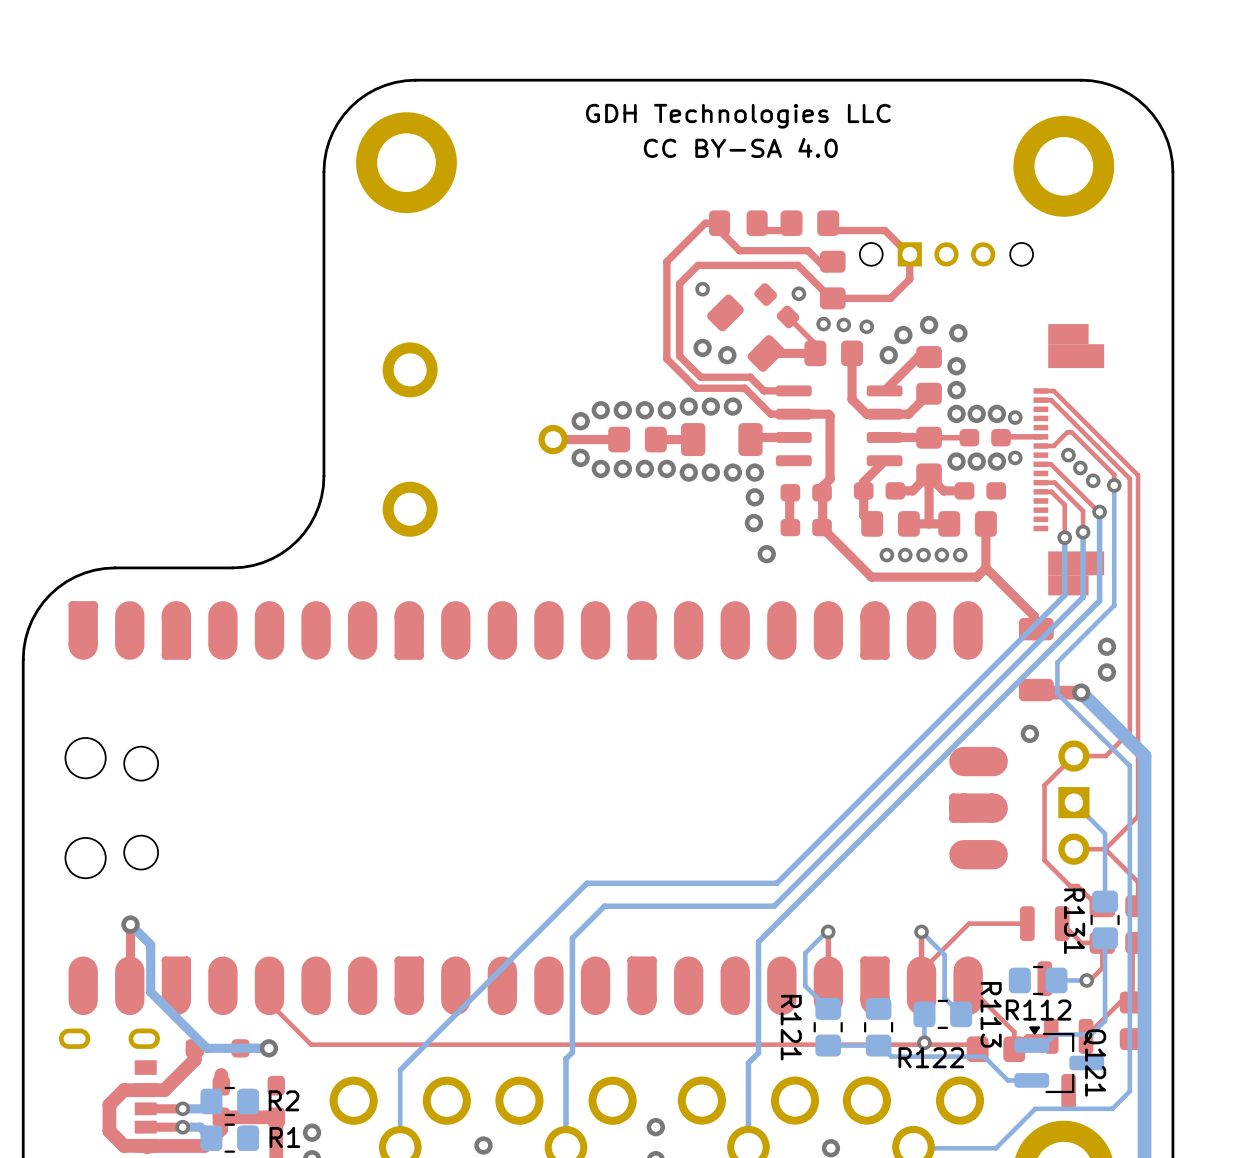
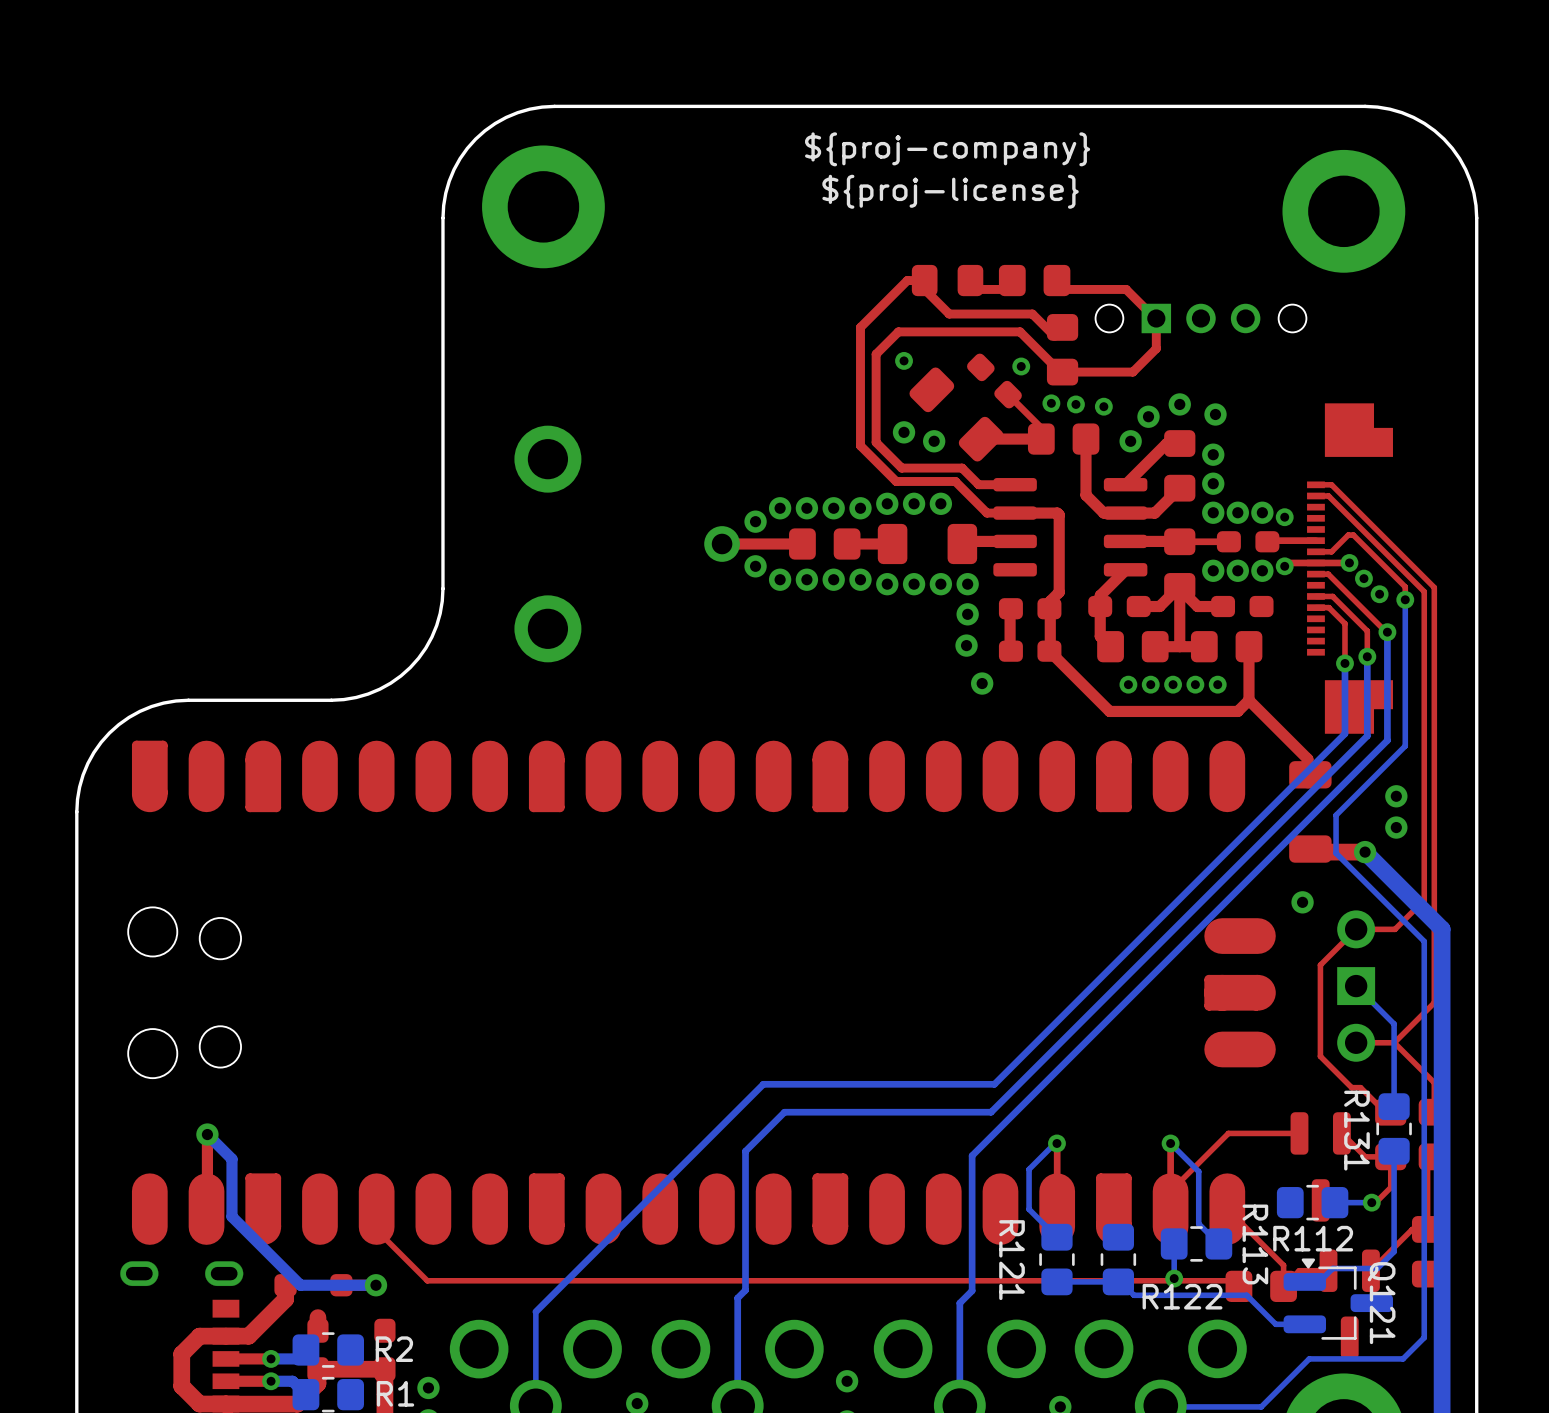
text: GDH Technologies LLC (738, 116) -> ${proj-company} (947, 149)
text: CC BY-SA 4.0 (740, 147) -> ${proj-license} (950, 191)
part footprint: [1033, 324, 1105, 596] -> [1307, 403, 1393, 734]
top track: none -> (1349, 562) (1288, 562) (1284, 566)

